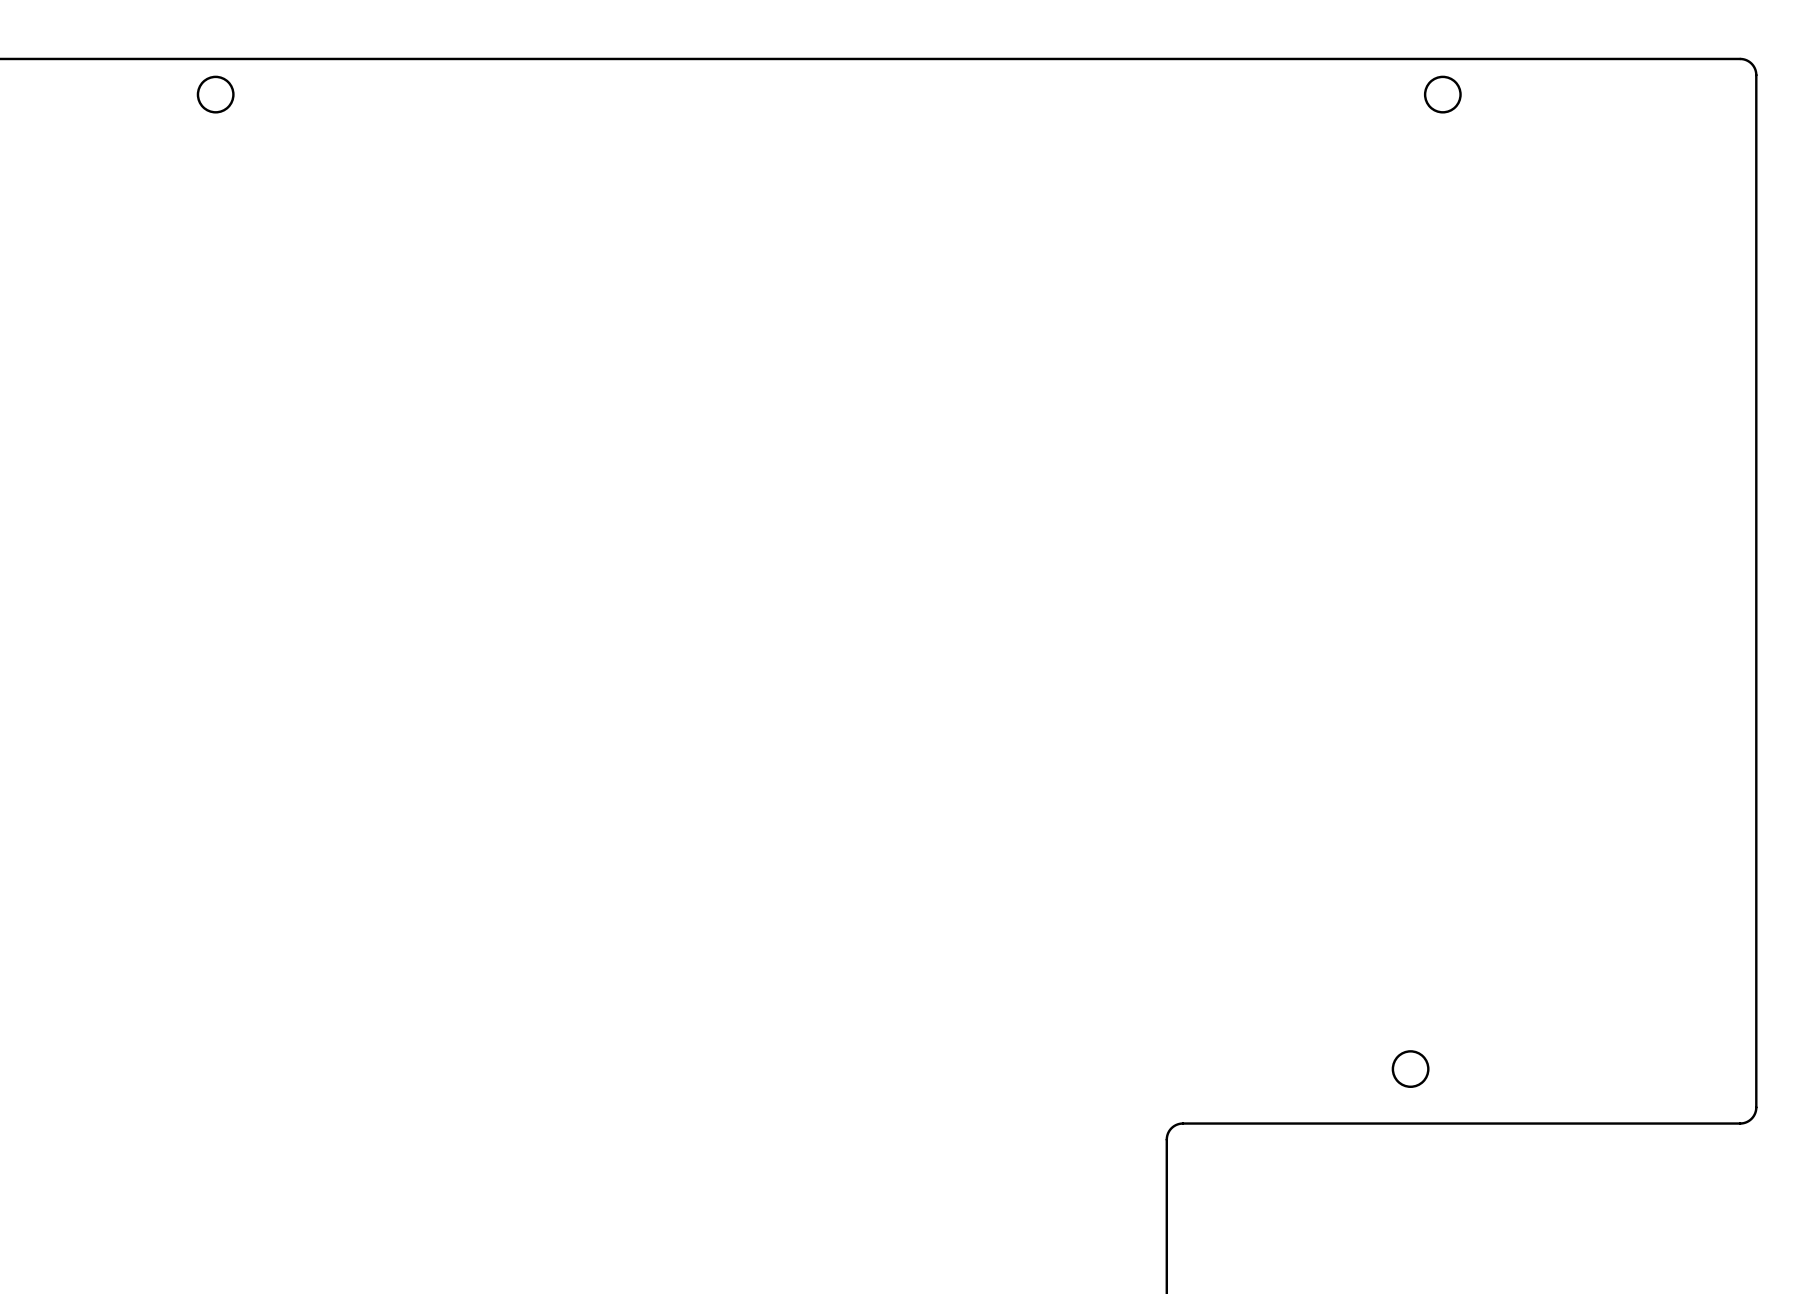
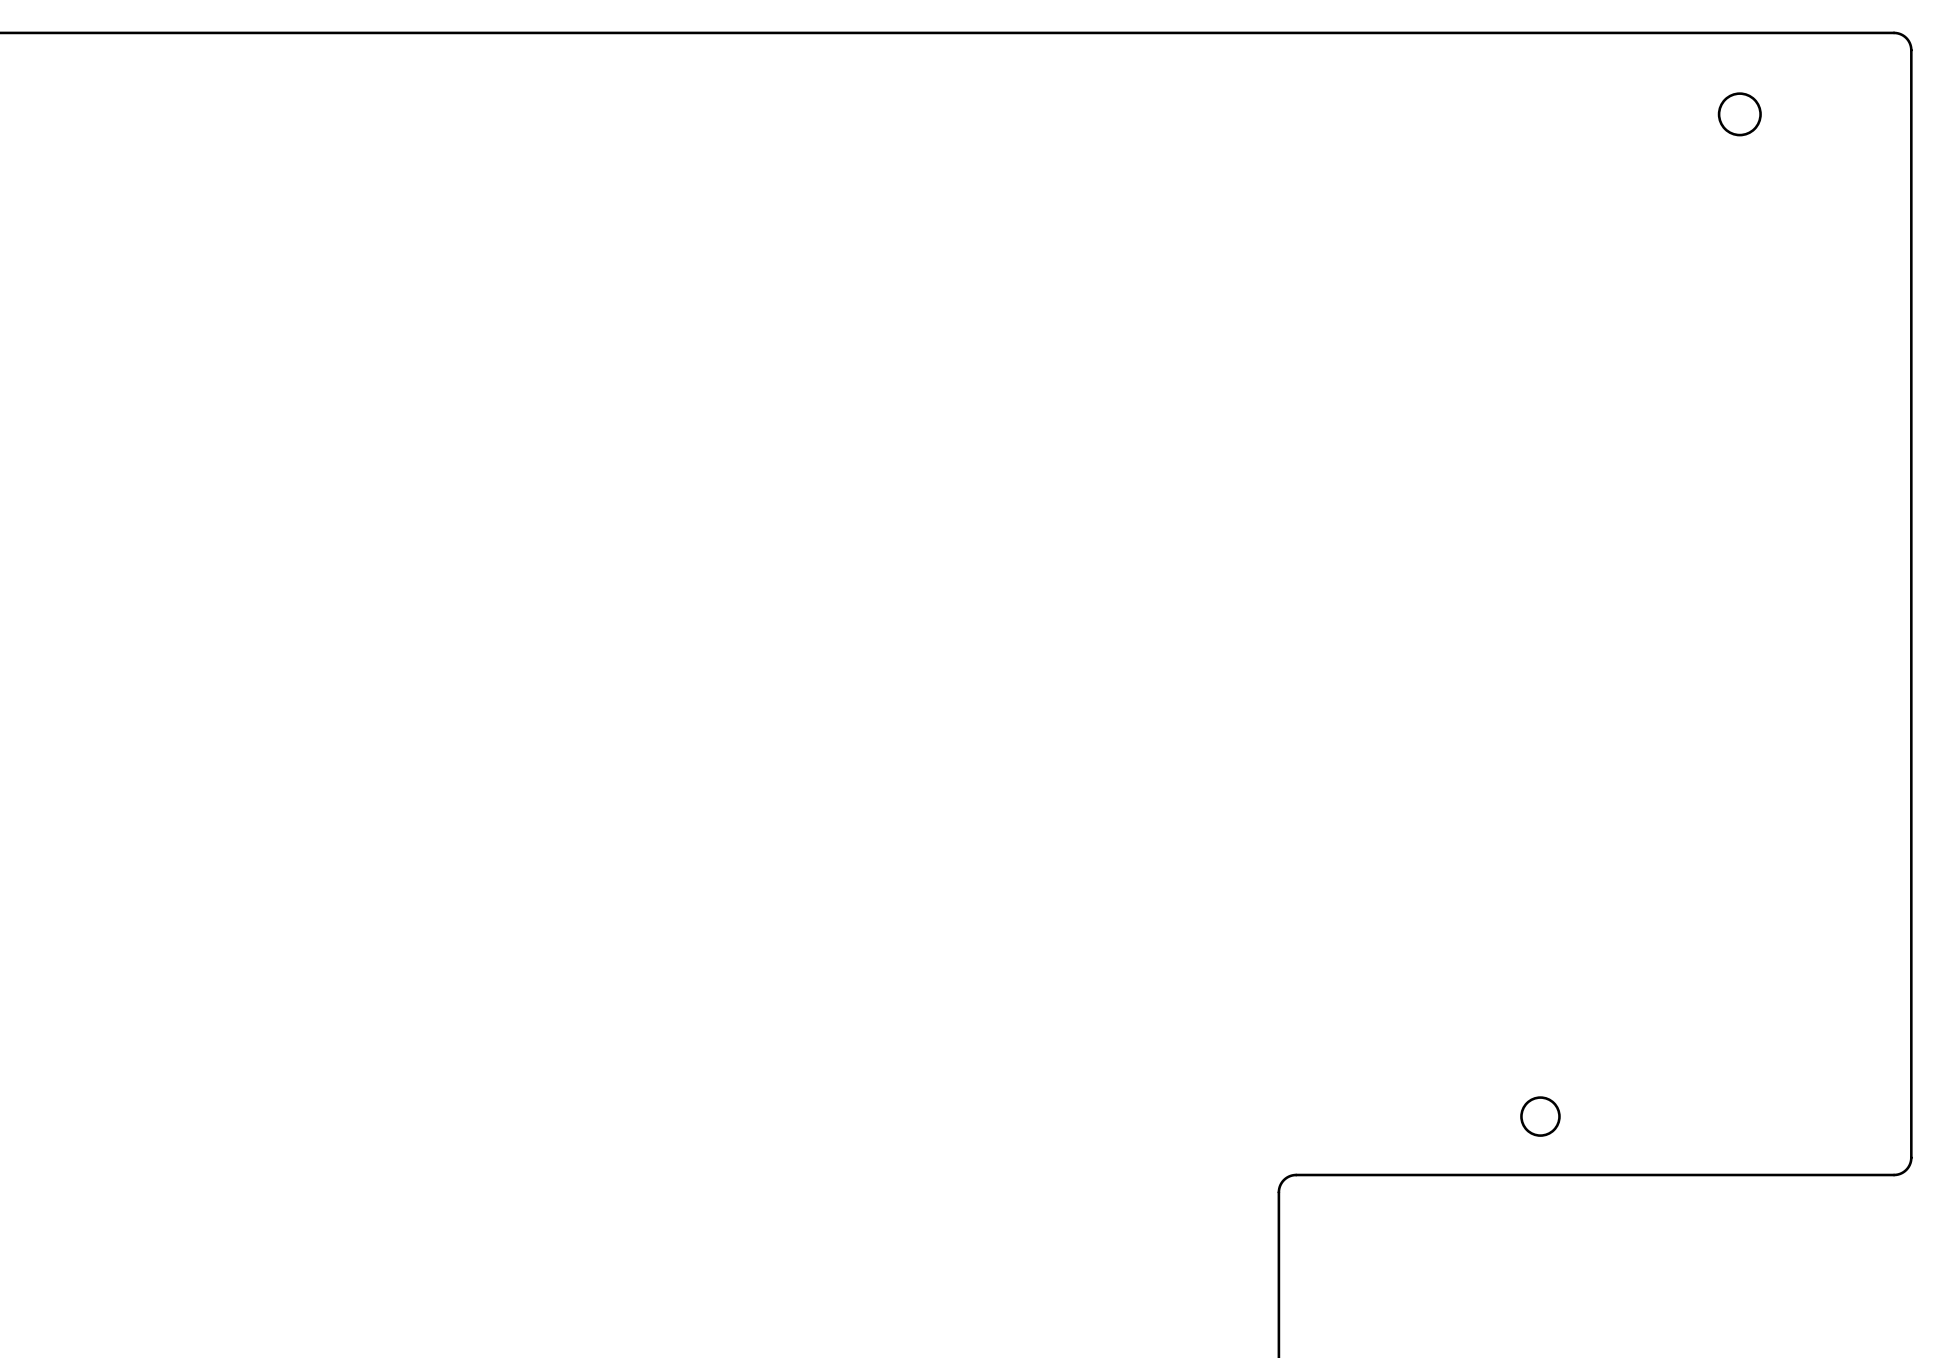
round board edge: [196, 75, 235, 114] -> none
round board edge: [1423, 75, 1462, 114] -> none
round board edge: none -> [1717, 92, 1762, 137]

